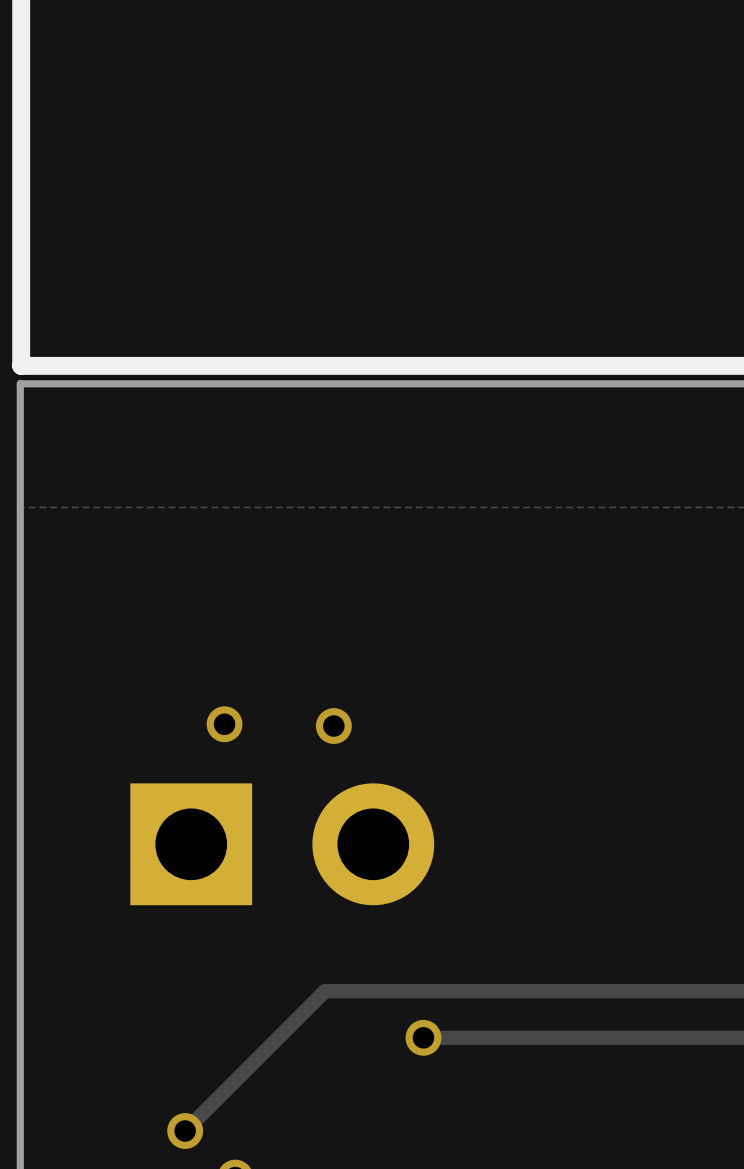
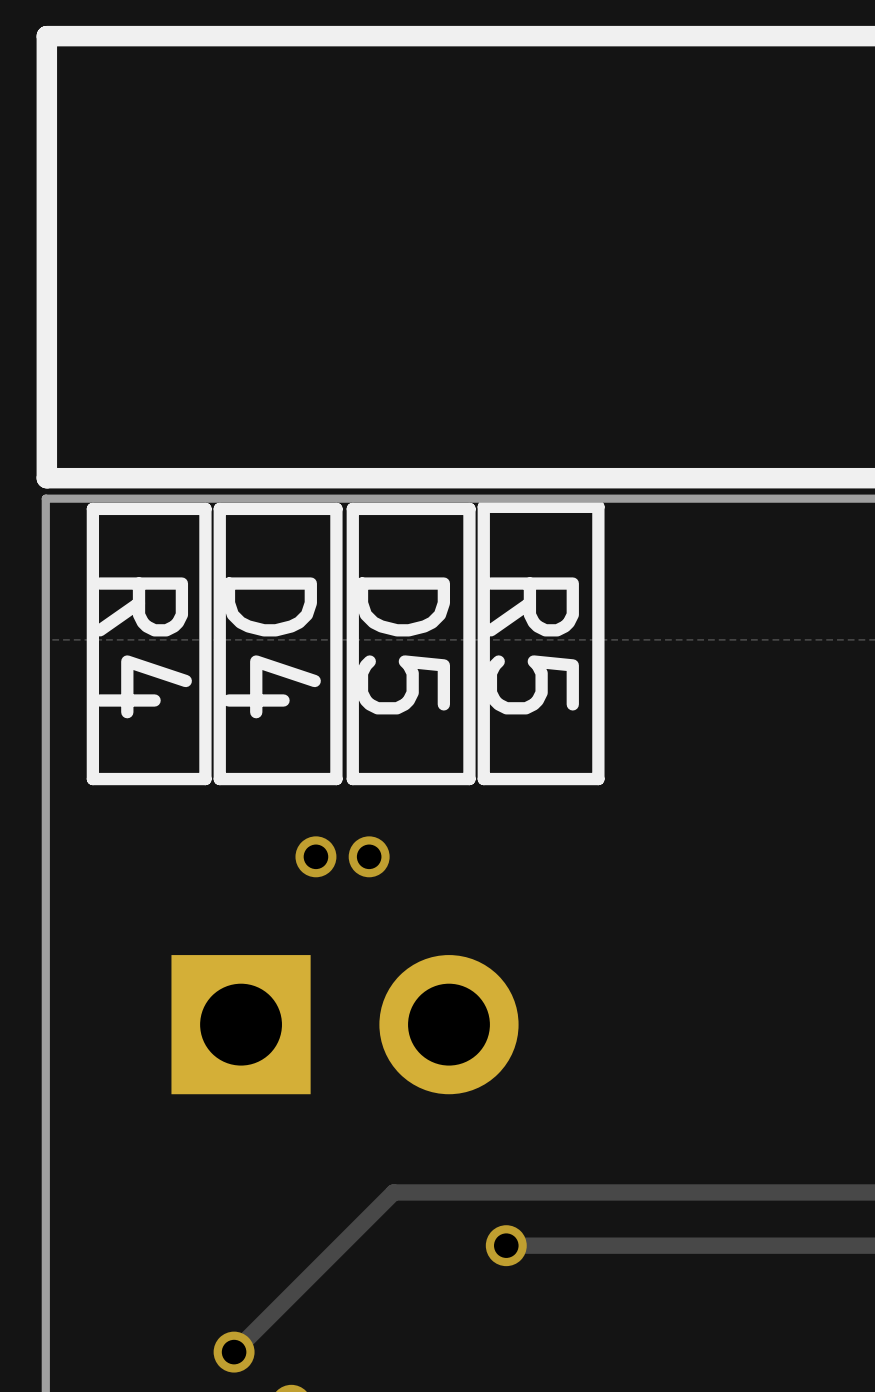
line: none -> (598, 506) (483, 506) (483, 779) (598, 779) (598, 506)
line: none -> (205, 508) (92, 508) (92, 779) (205, 779) (205, 508)
line: none -> (336, 508) (219, 508) (219, 779) (336, 779) (336, 508)
line: none -> (469, 508) (352, 508) (352, 779) (469, 779) (469, 508)
D5: none -> (402, 645)
R5: none -> (531, 645)
R4: none -> (142, 647)
D4: none -> (271, 647)
via position: (224, 724) -> (315, 856)
via position: (333, 726) -> (369, 856)

